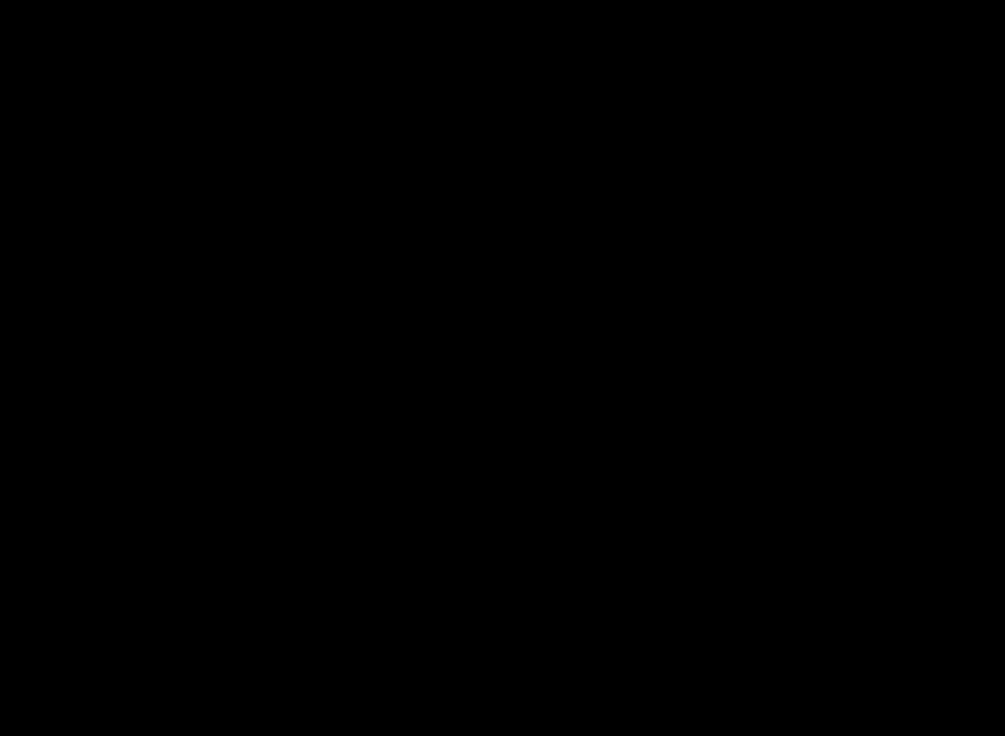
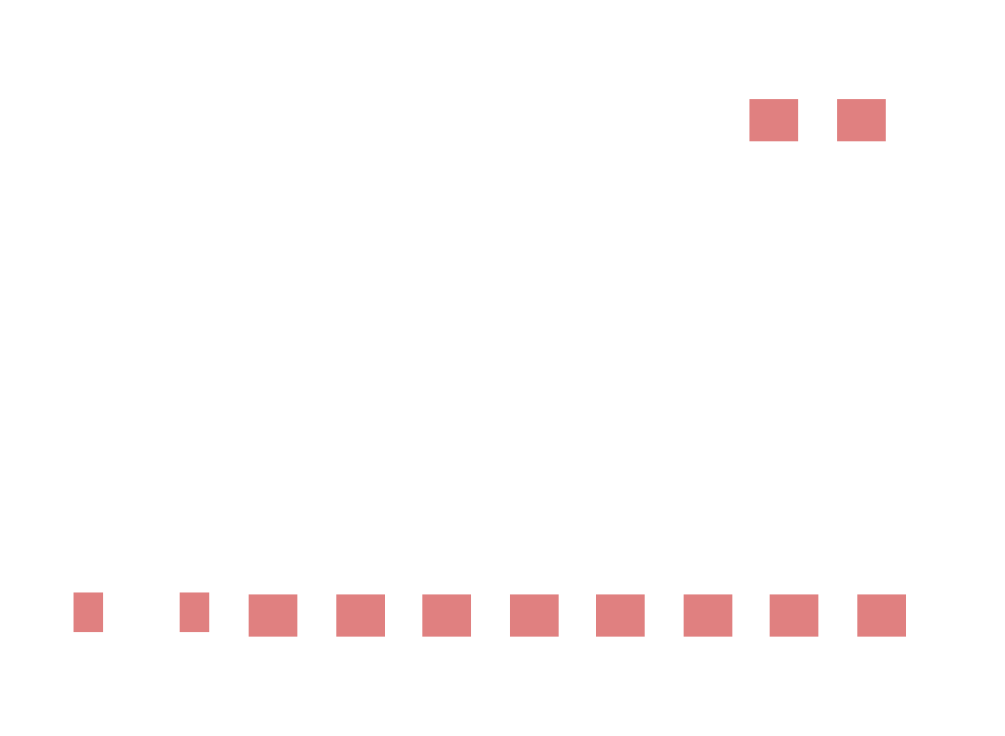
part: none -> (817, 120)
part: none -> (141, 612)
part: none -> (316, 615)
part: none -> (490, 615)
part: none -> (664, 615)
part: none -> (837, 615)

